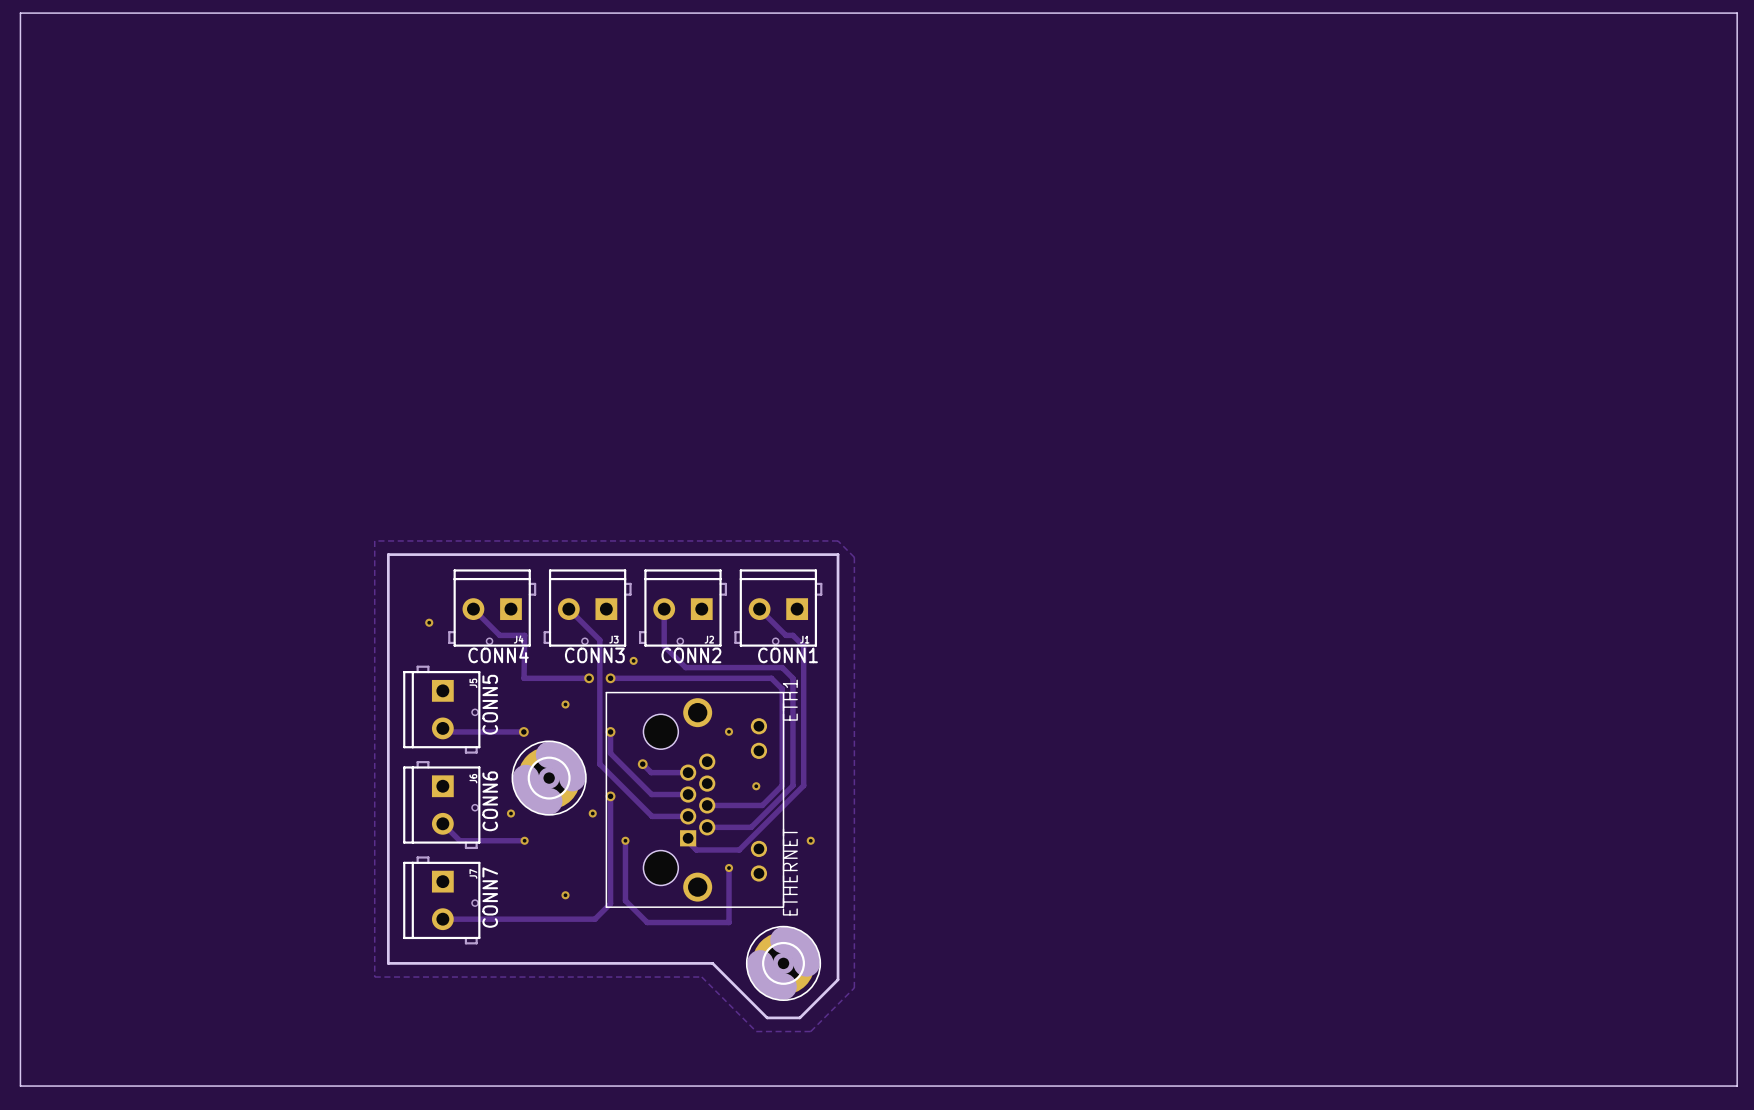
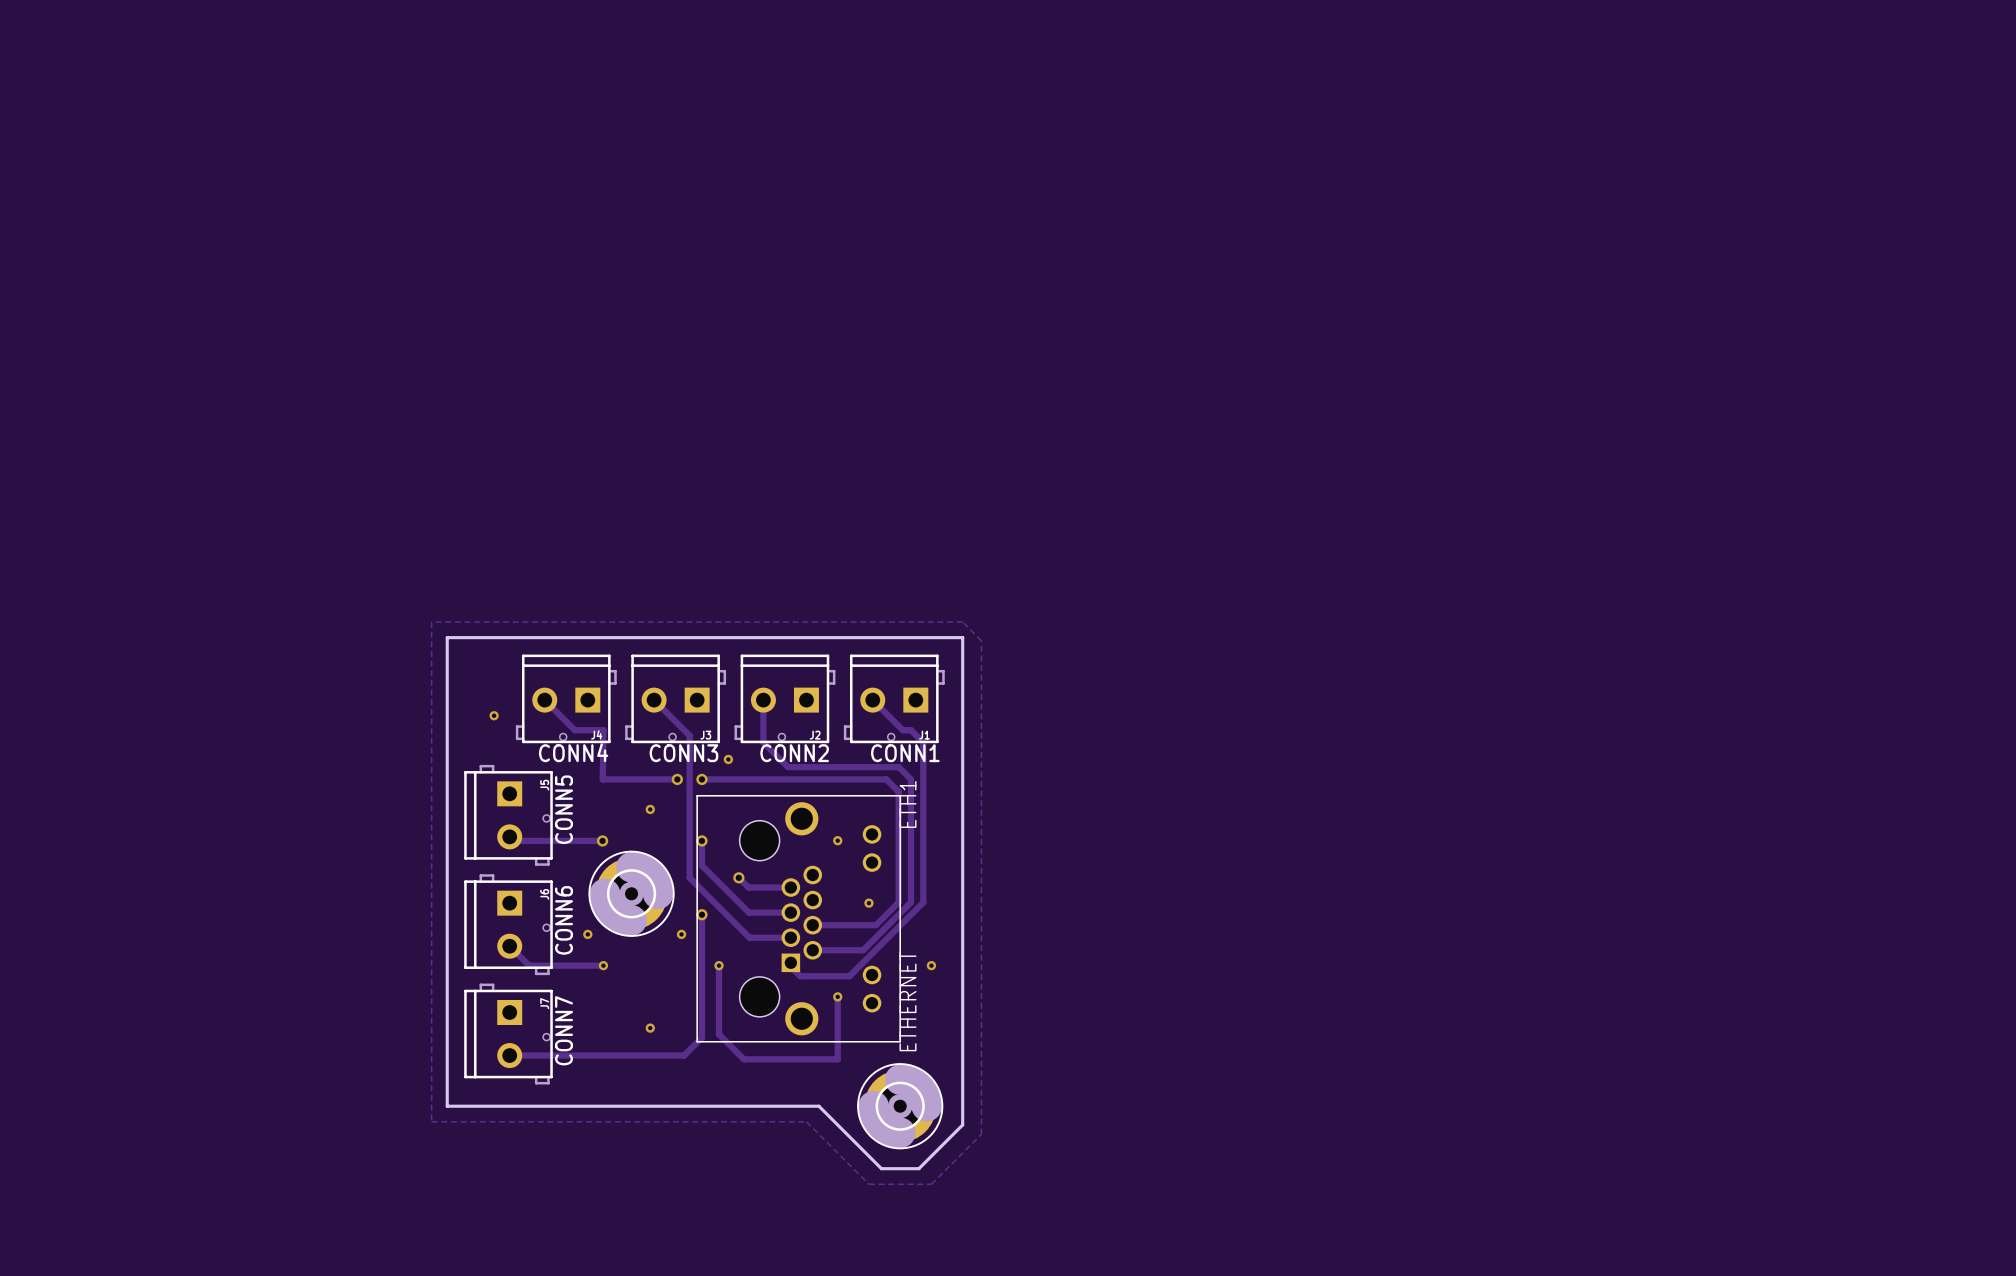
board edge: (20, 13) (1737, 13) (1737, 1086) (20, 1086) (20, 13) -> none

